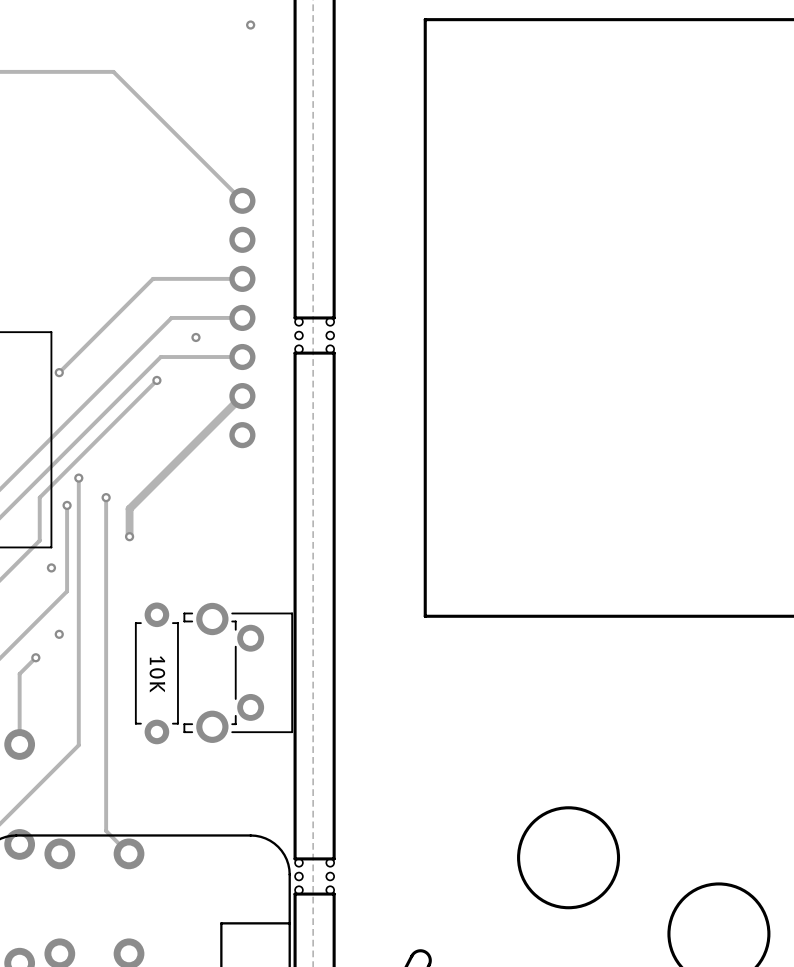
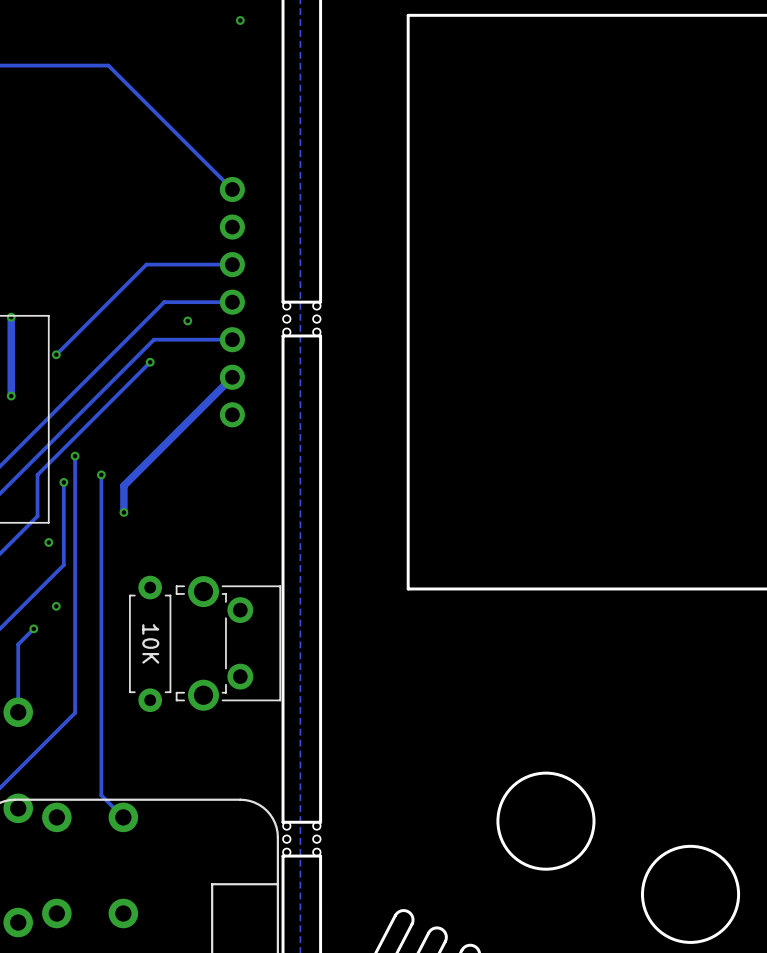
track: none -> (11, 317) (11, 396)
via: none -> (11, 317)
via: none -> (11, 396)

